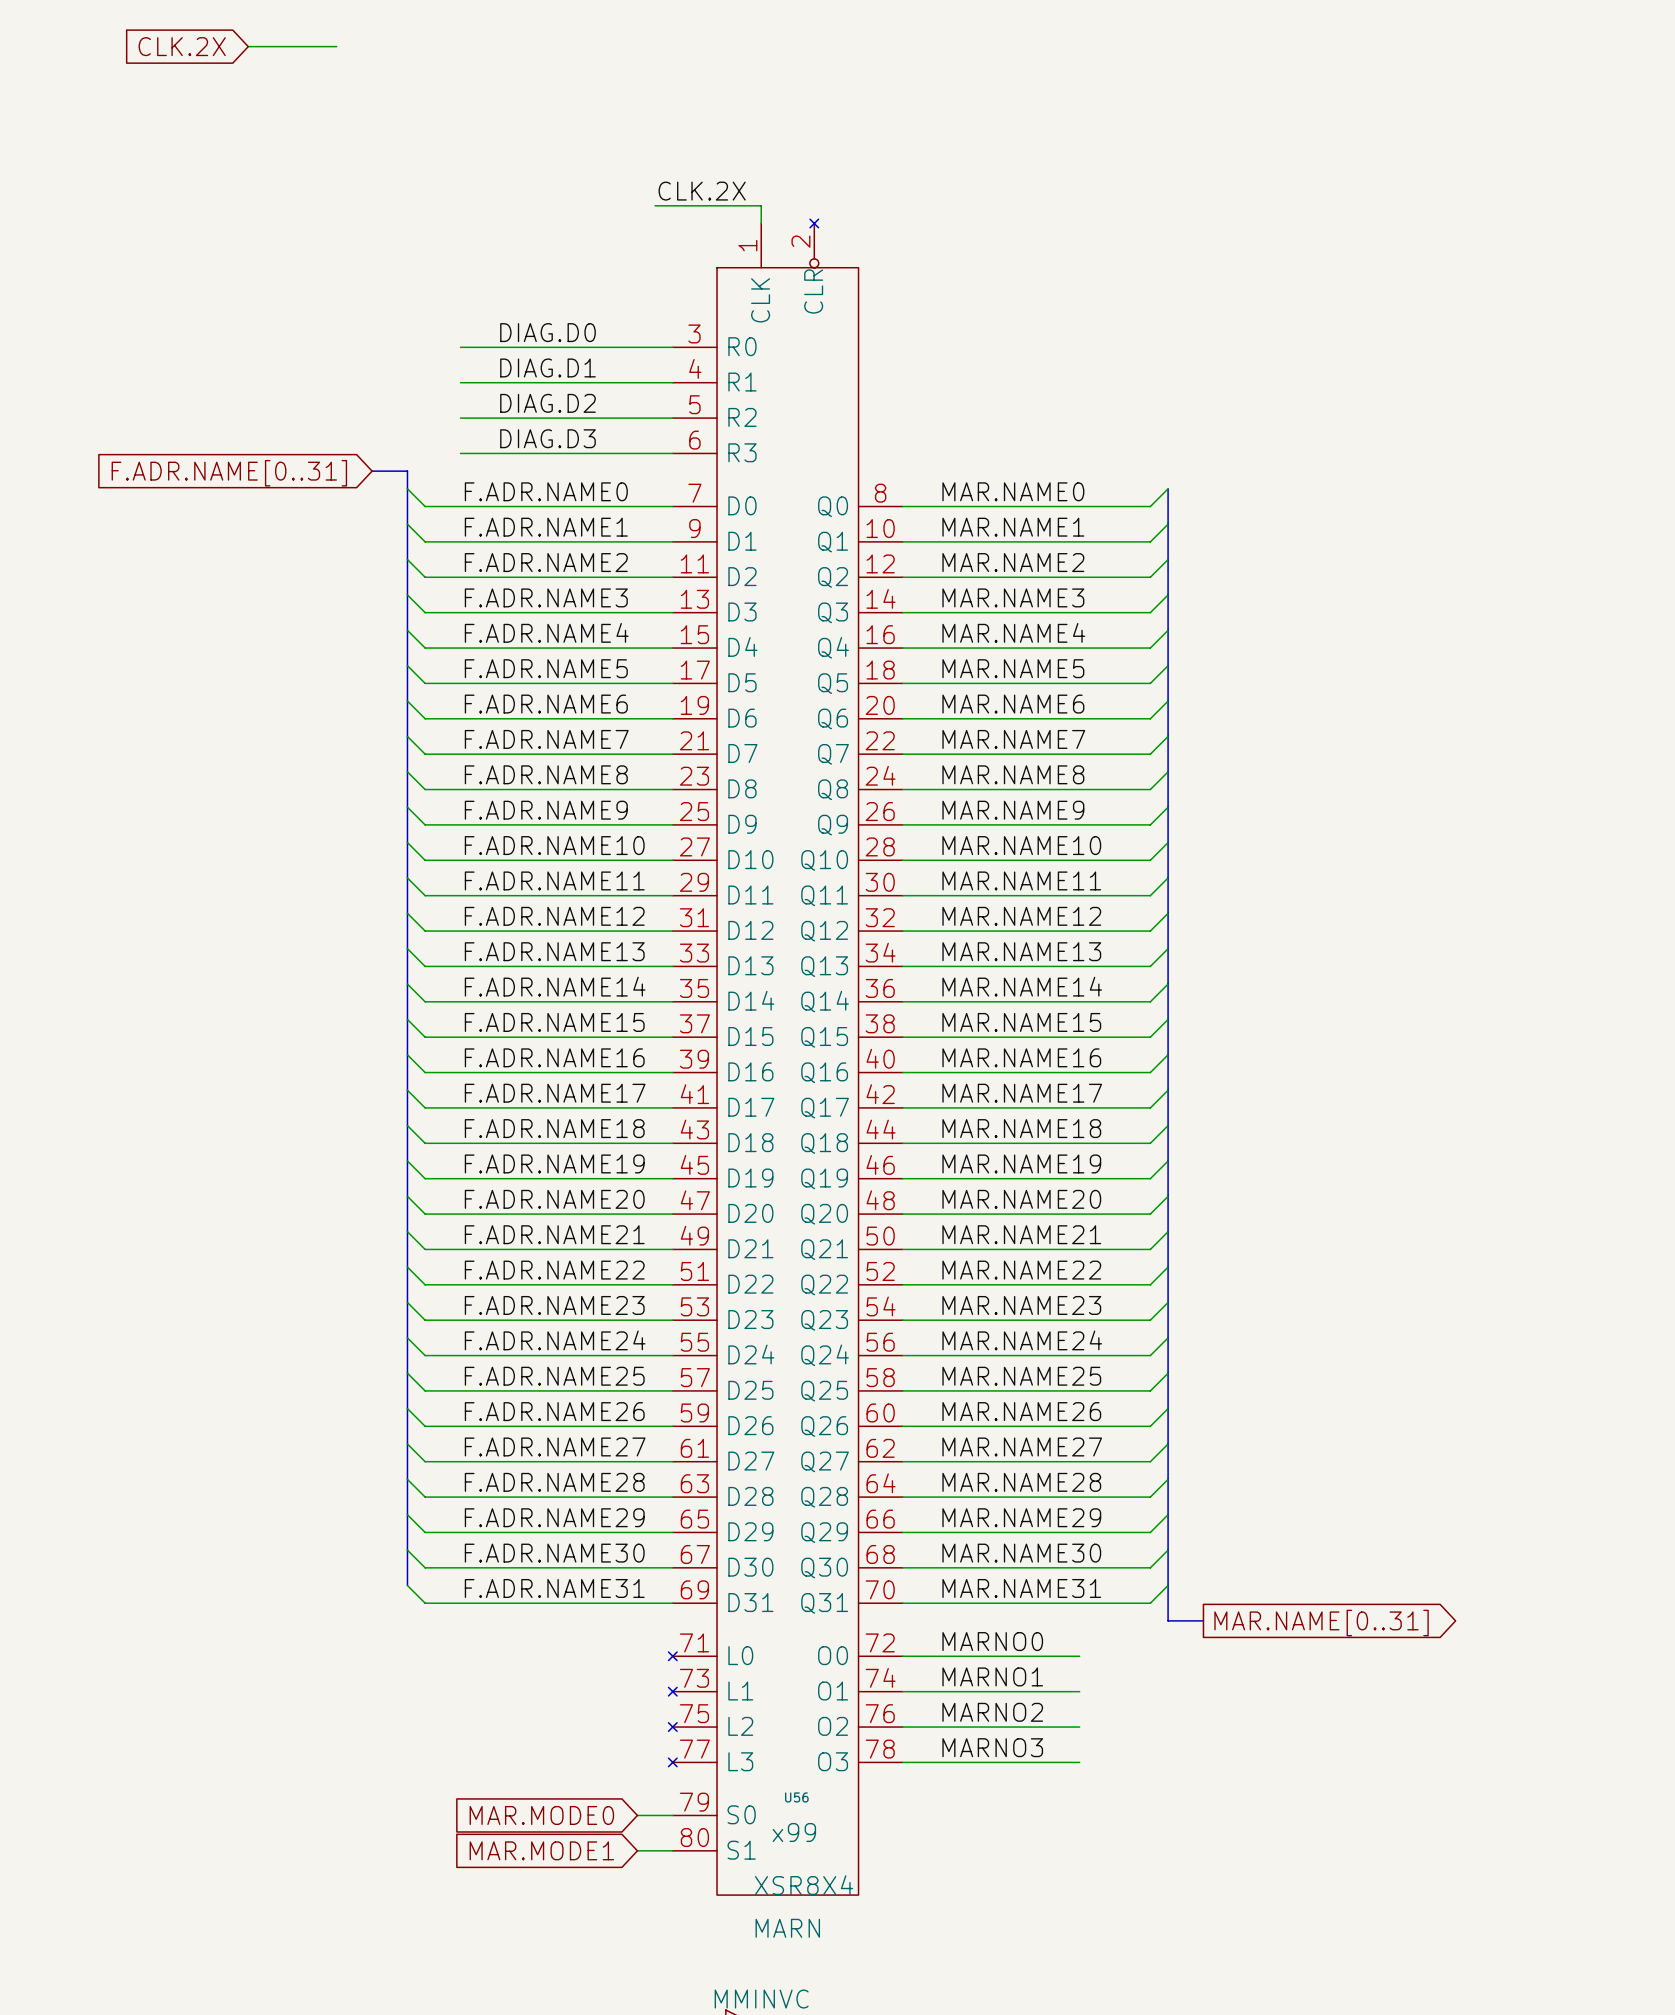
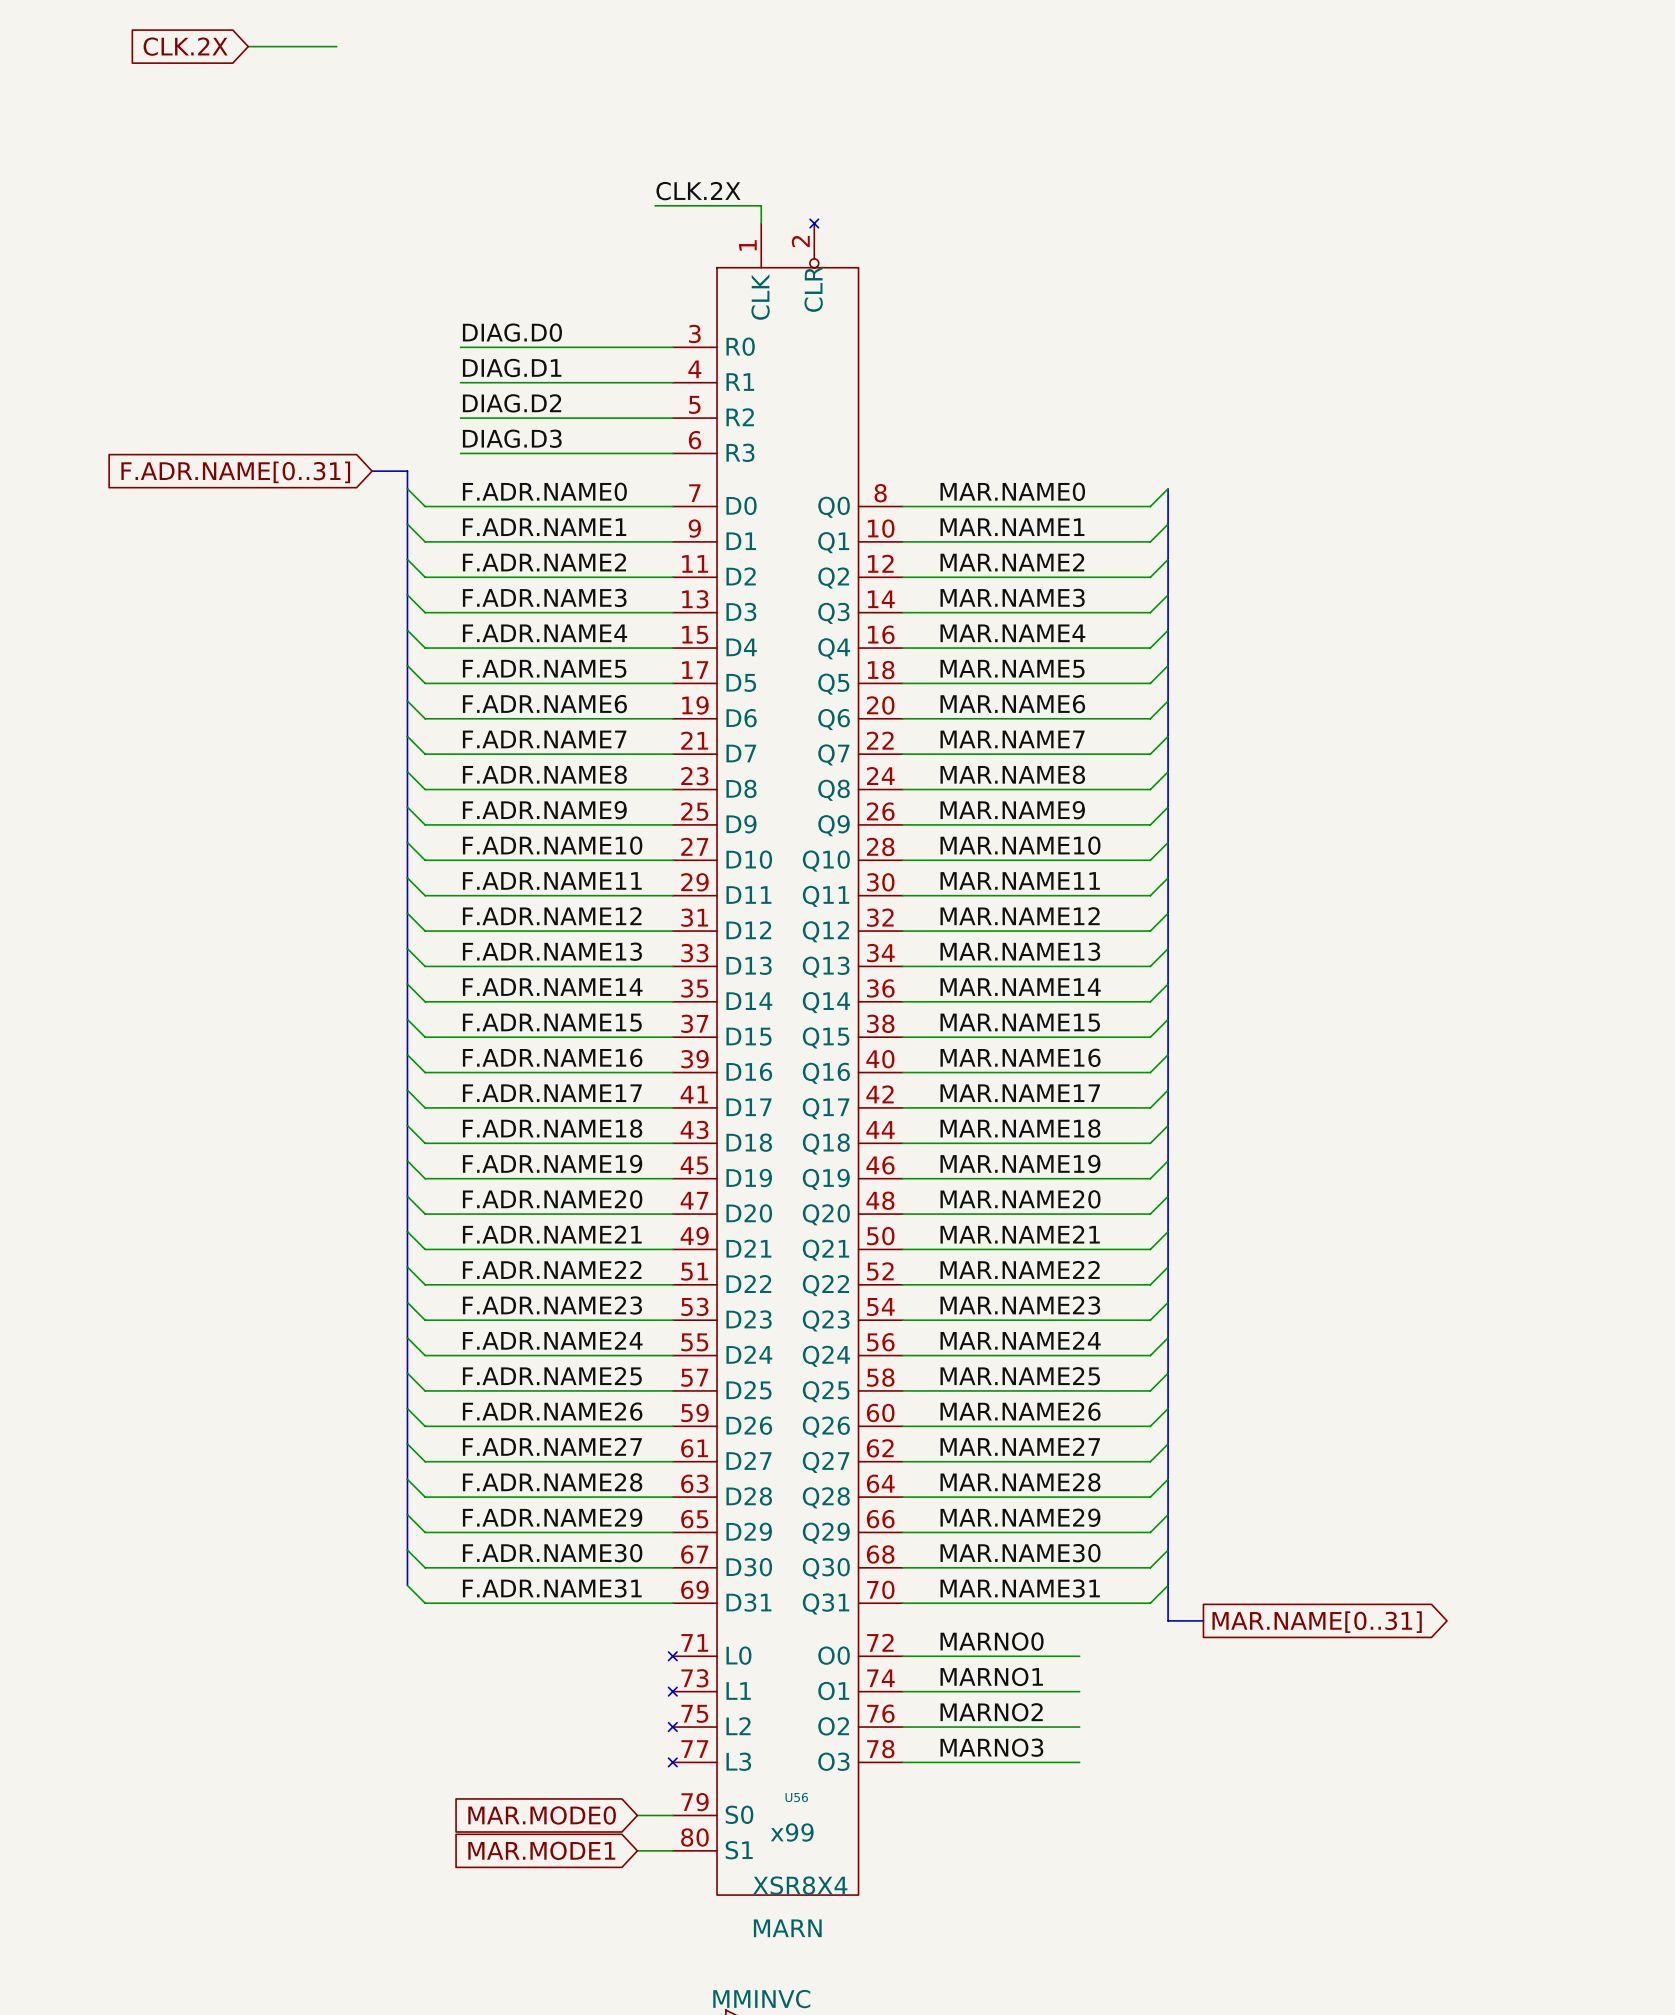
label position: DIAG.D0 (547, 332) -> DIAG.D0 (512, 332)
label position: DIAG.D1 (547, 367) -> DIAG.D1 (512, 367)
label position: DIAG.D2 (547, 403) -> DIAG.D2 (512, 403)
label position: DIAG.D3 (547, 438) -> DIAG.D3 (512, 438)

